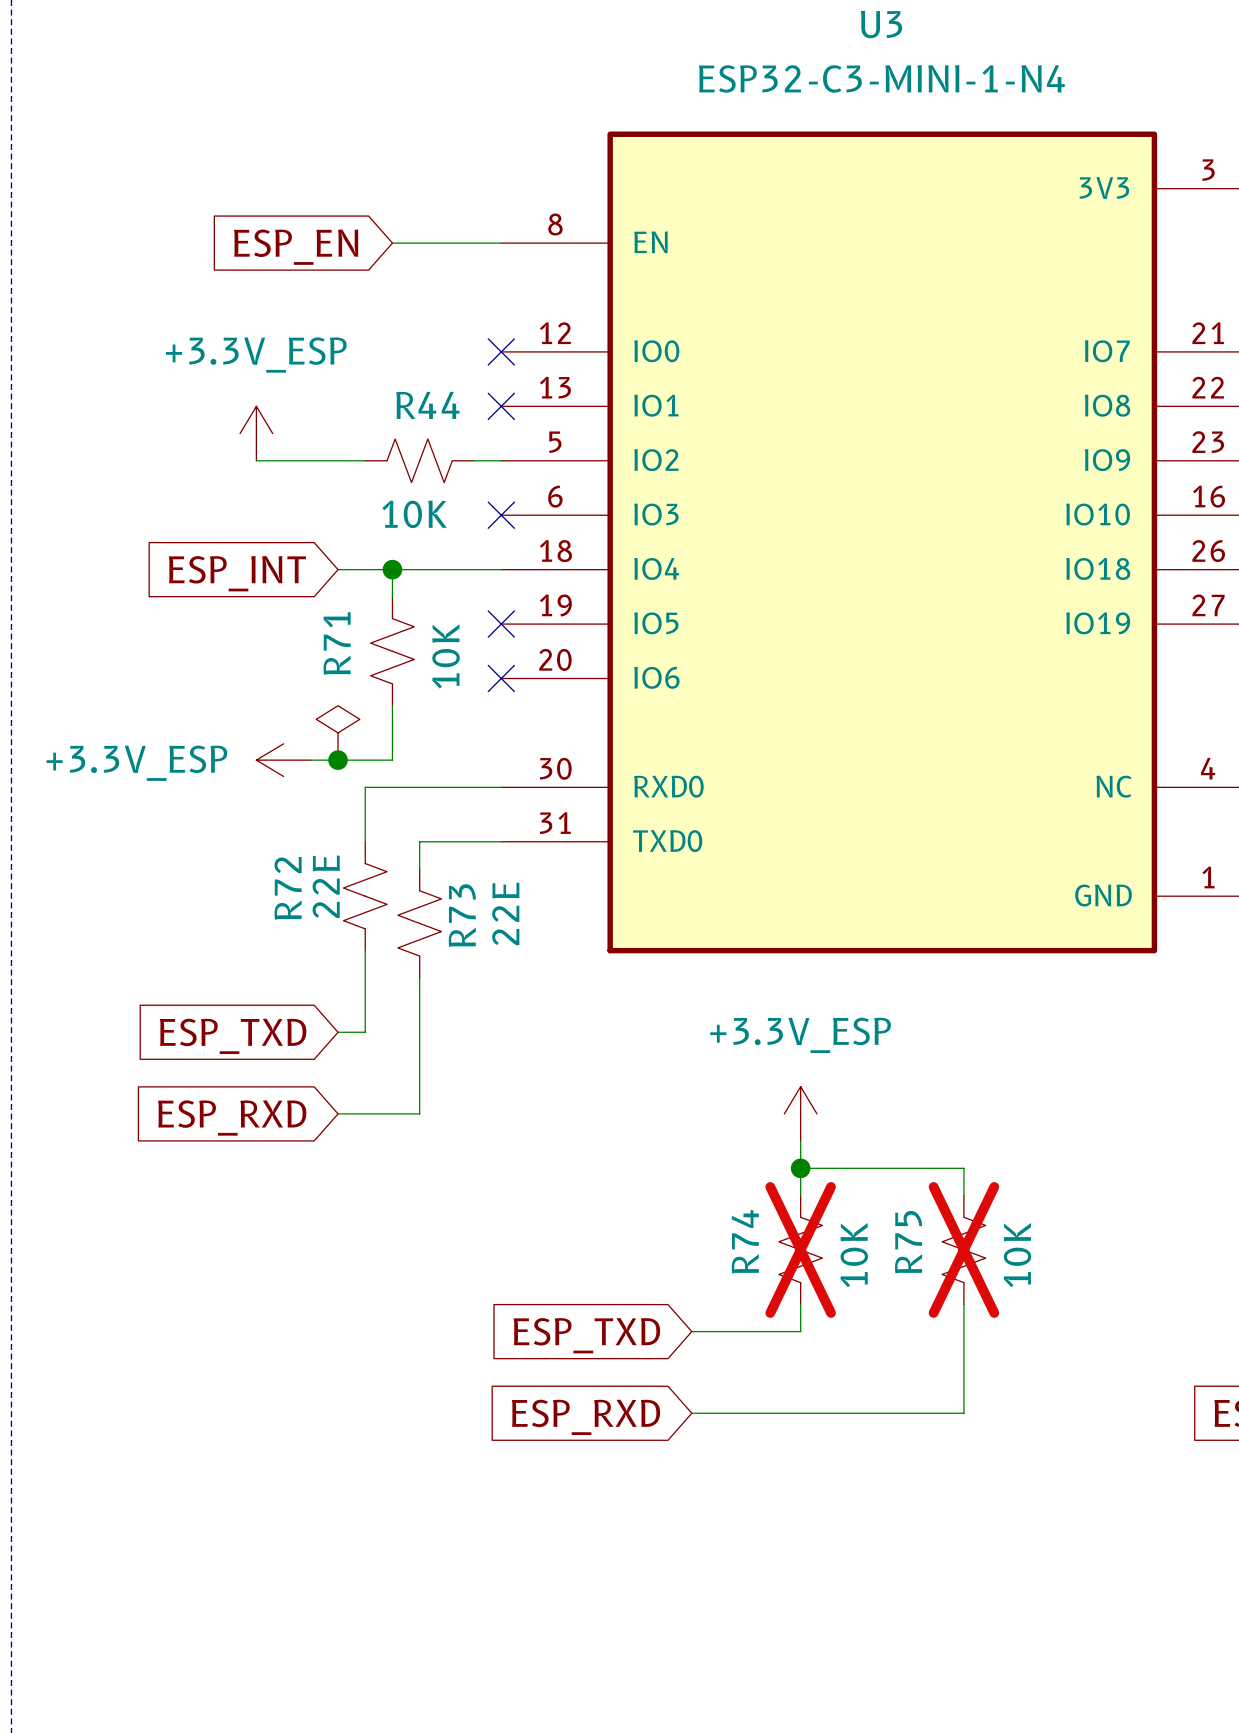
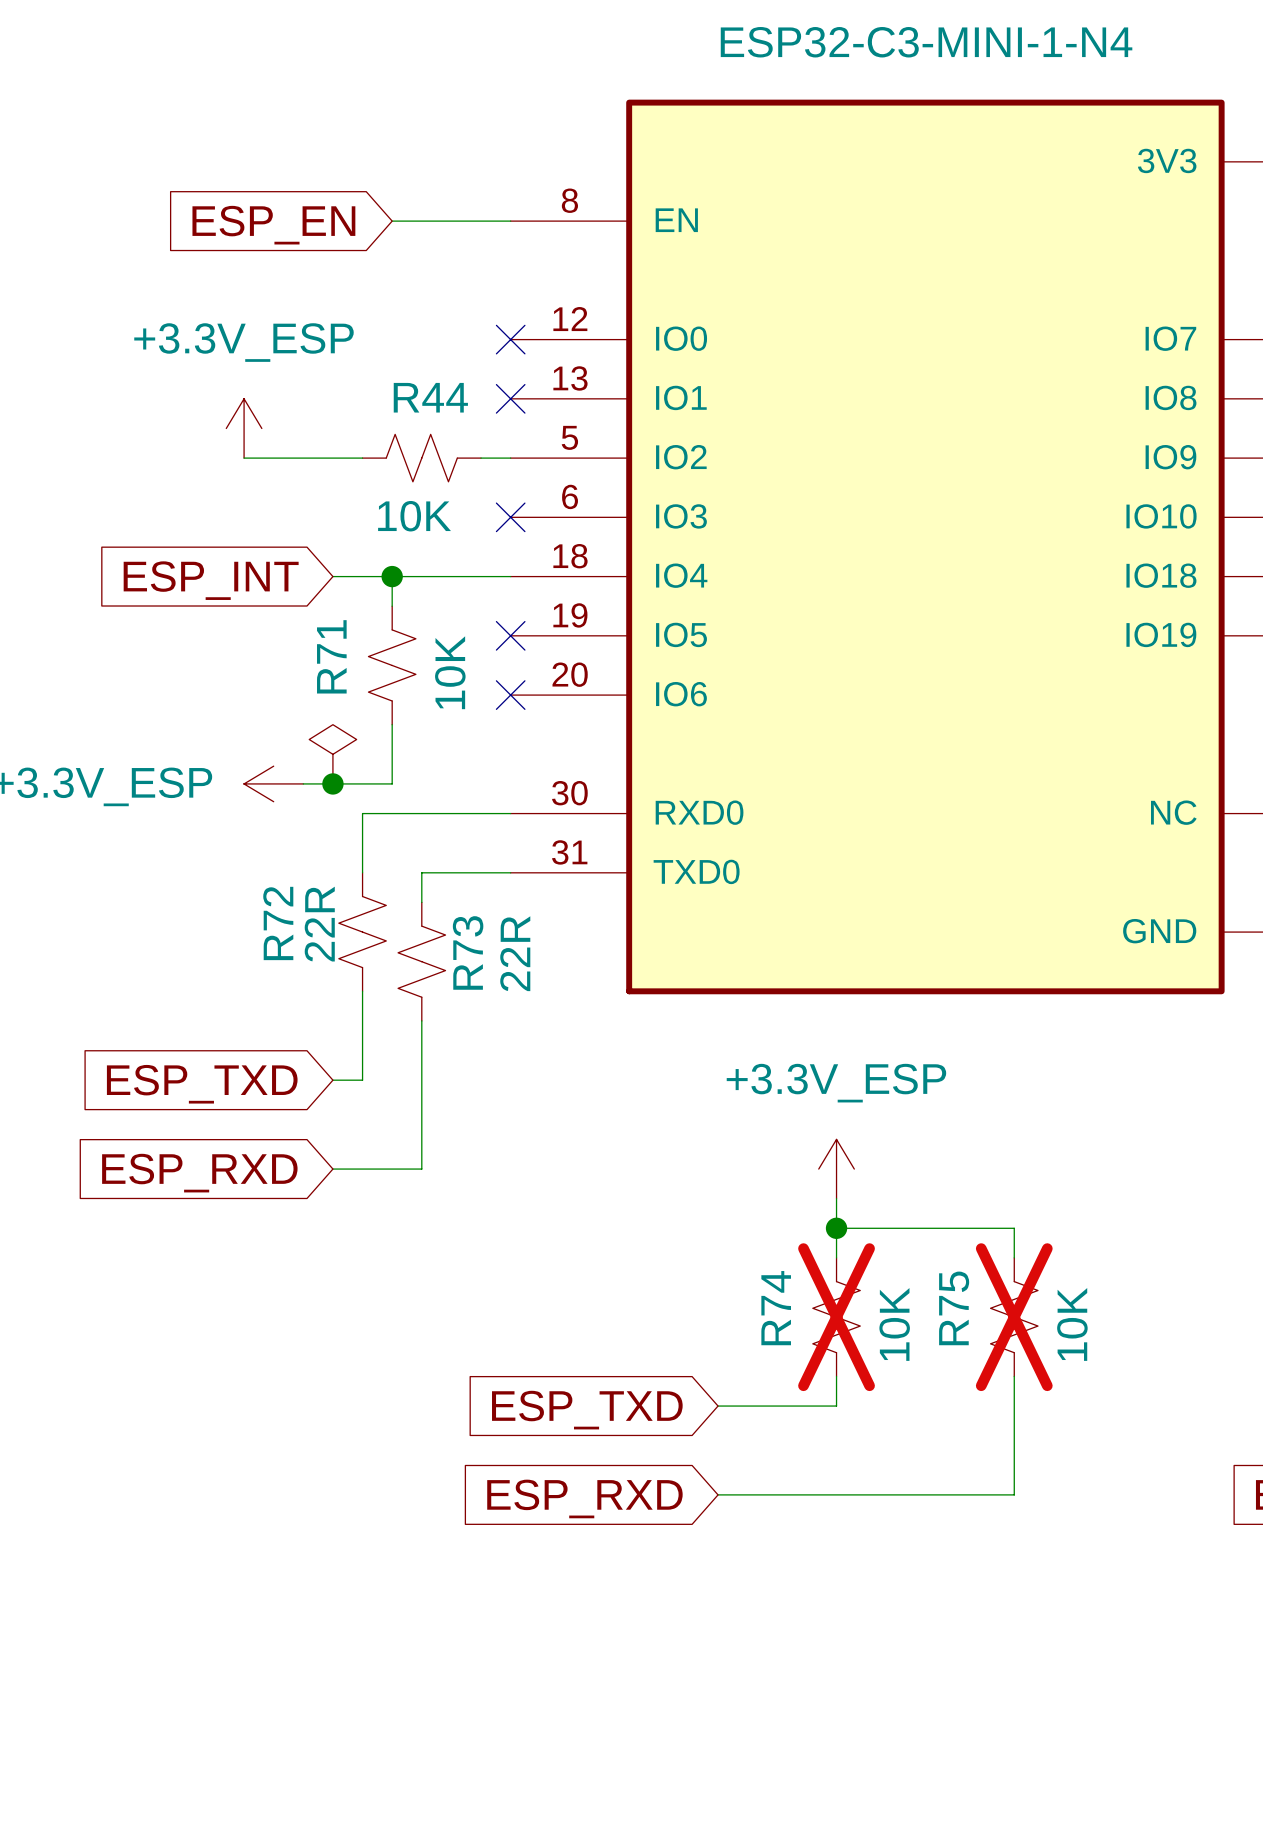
R72 value: 22E (326, 886) -> 22R (319, 924)
R73 value: 22E (505, 913) -> 22R (515, 953)

